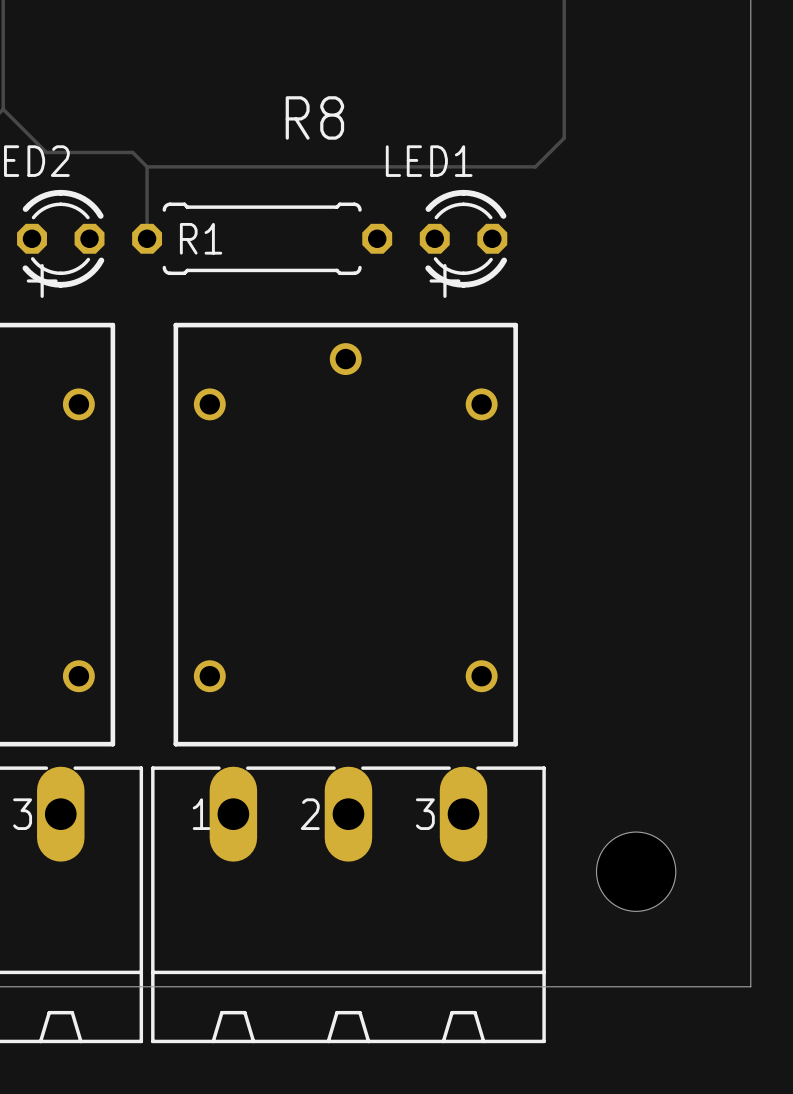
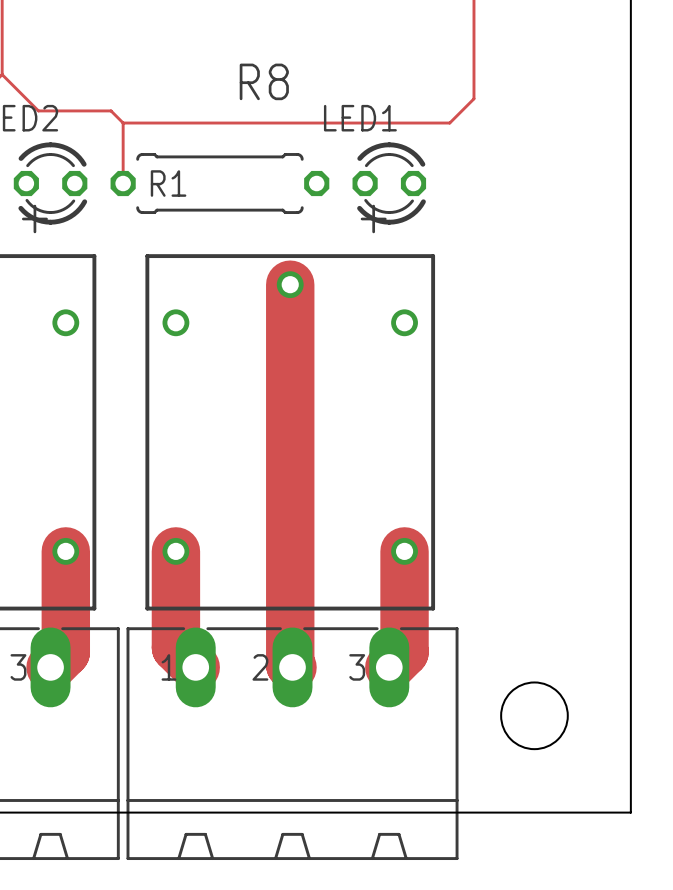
track: none -> (290, 284) (290, 665) (292, 667)
track: none -> (65, 551) (65, 652) (50, 667)
track: none -> (175, 551) (175, 647) (195, 667)
track: none -> (404, 551) (404, 652) (389, 667)

